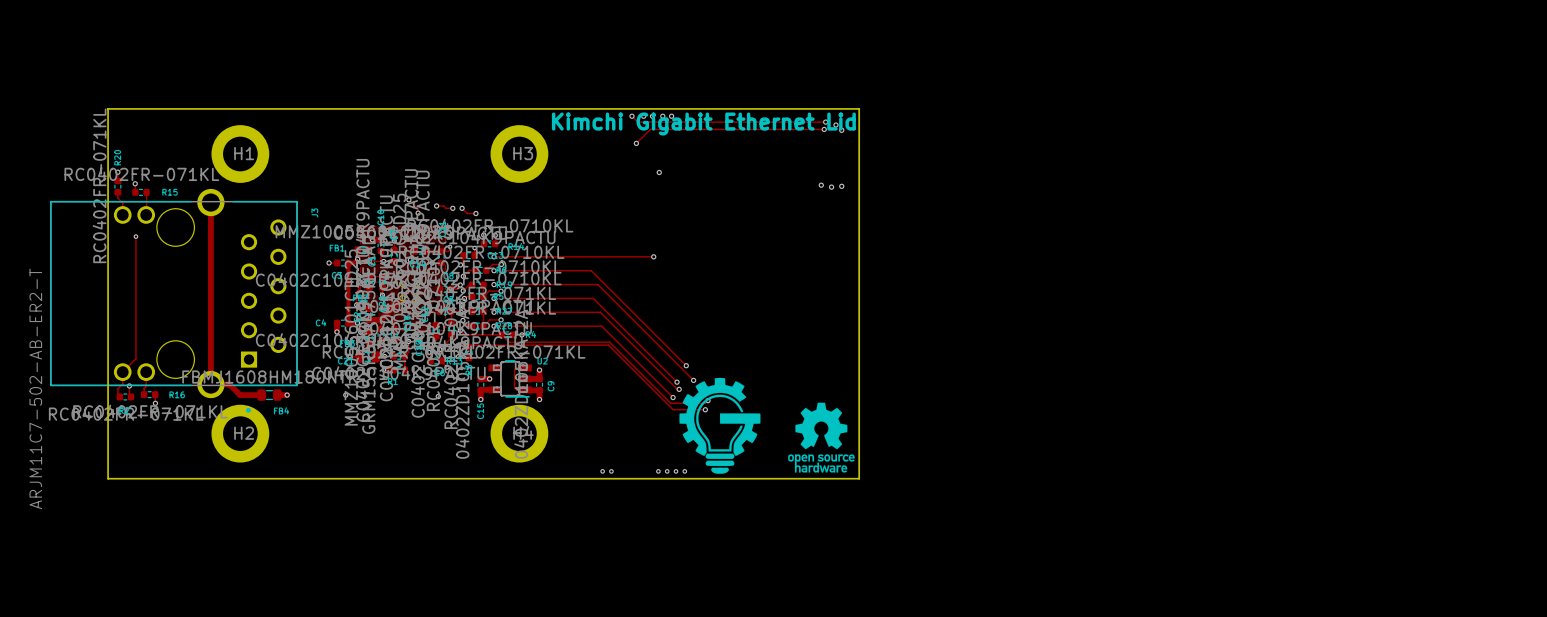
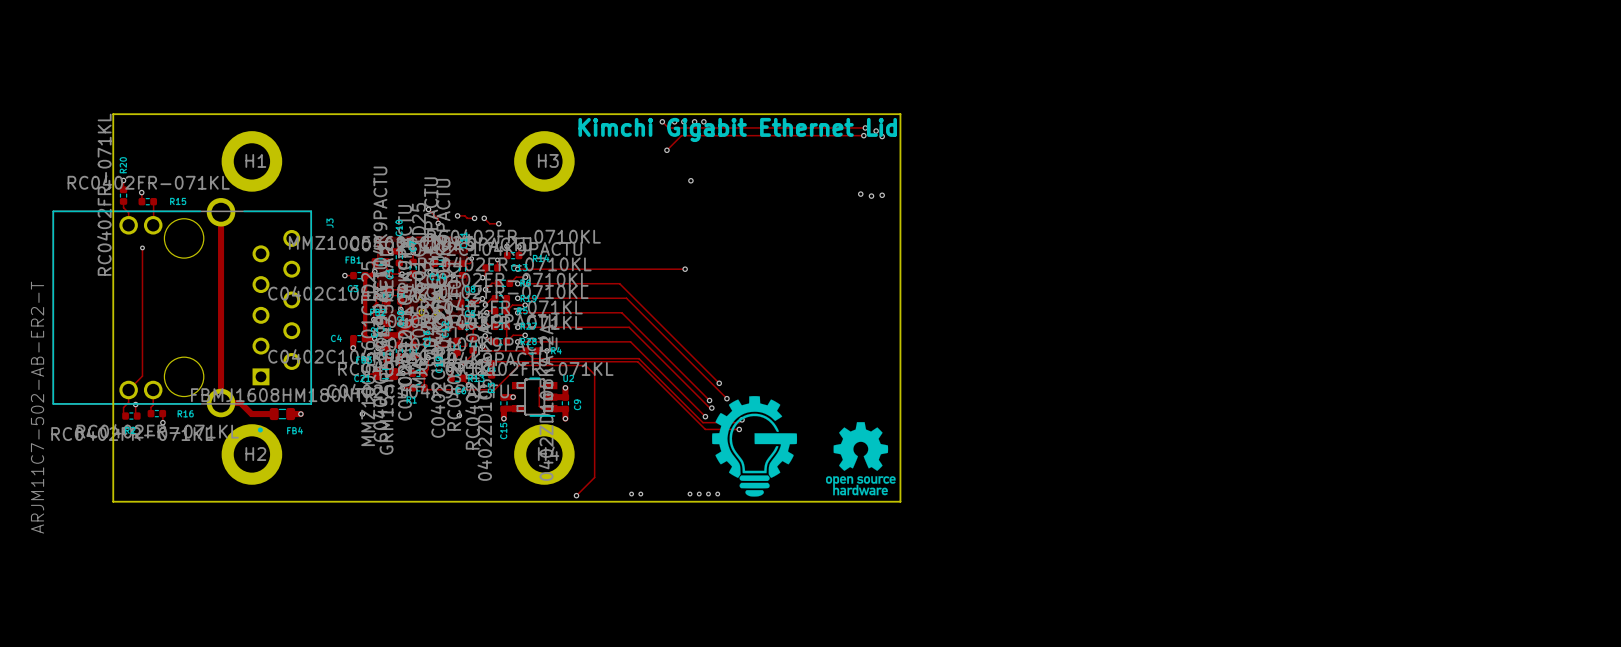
track: none -> (424, 387) (426, 389) (494, 389) (518, 365) (585, 365) (594, 374) (594, 477) (576, 495)
via: none -> (576, 495)

